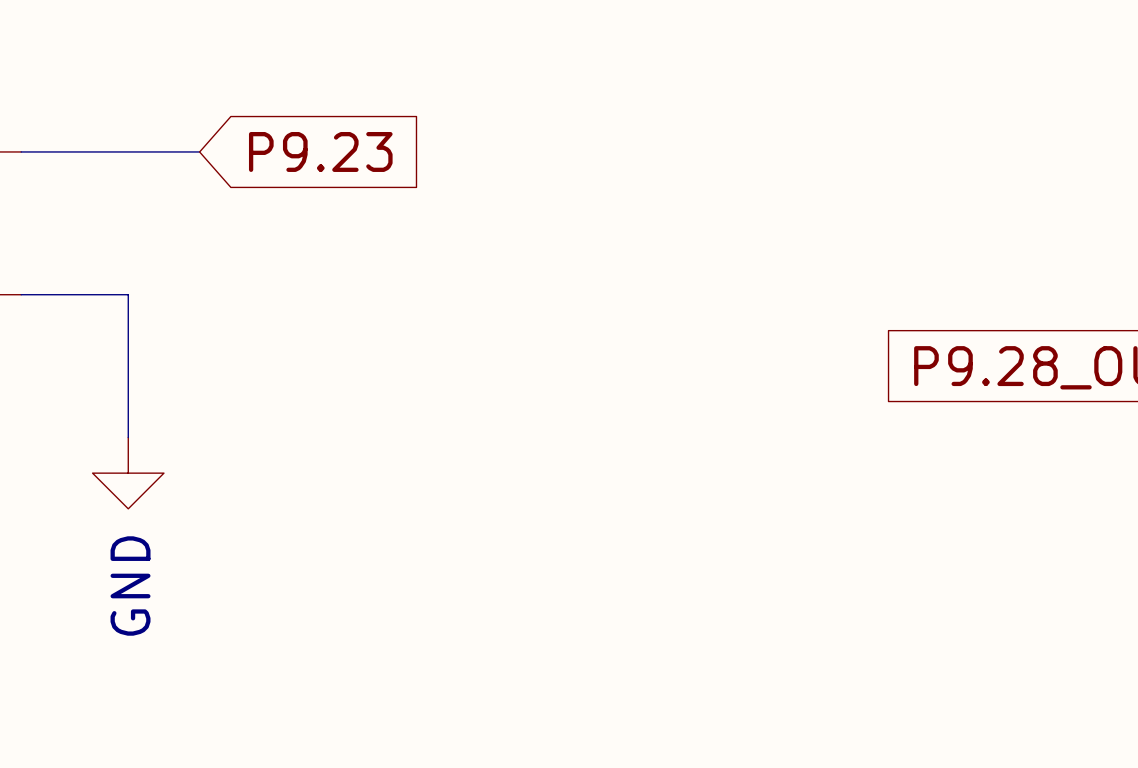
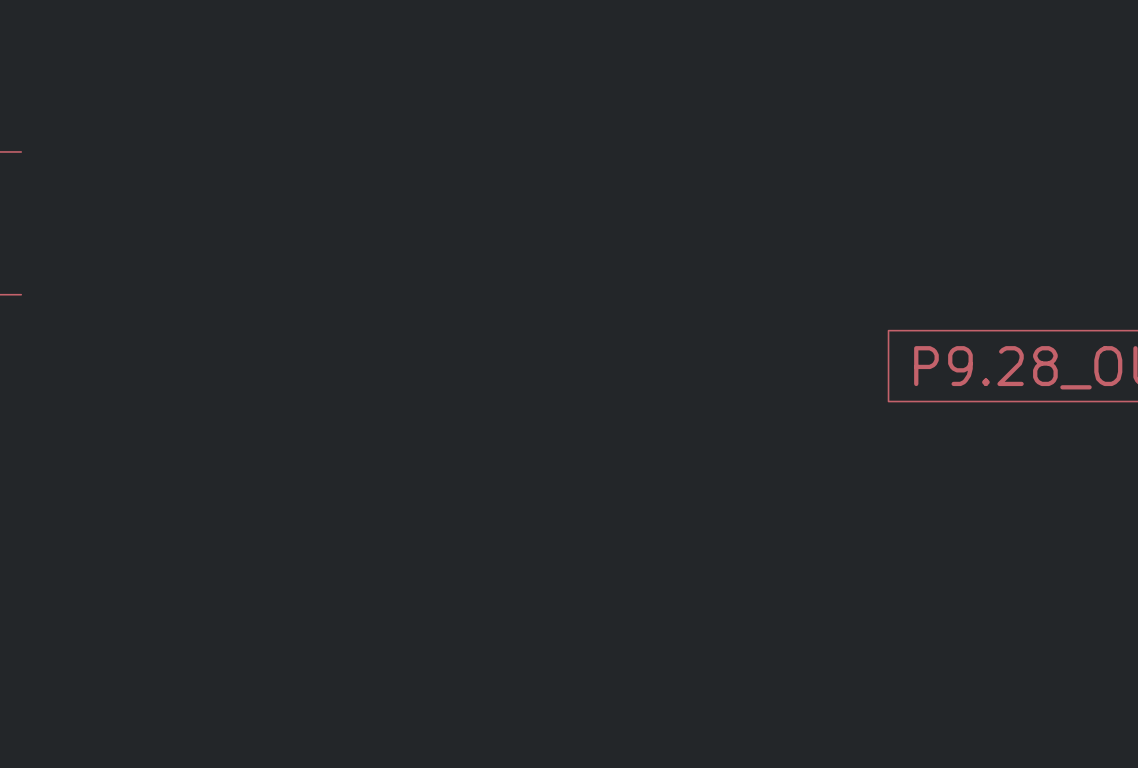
wire: (21, 151) (199, 151) -> none
global label: P9.23 (320, 151) -> none
wire: (21, 294) (128, 294) (128, 437) -> none
power symbol: GND (128, 473) -> none

